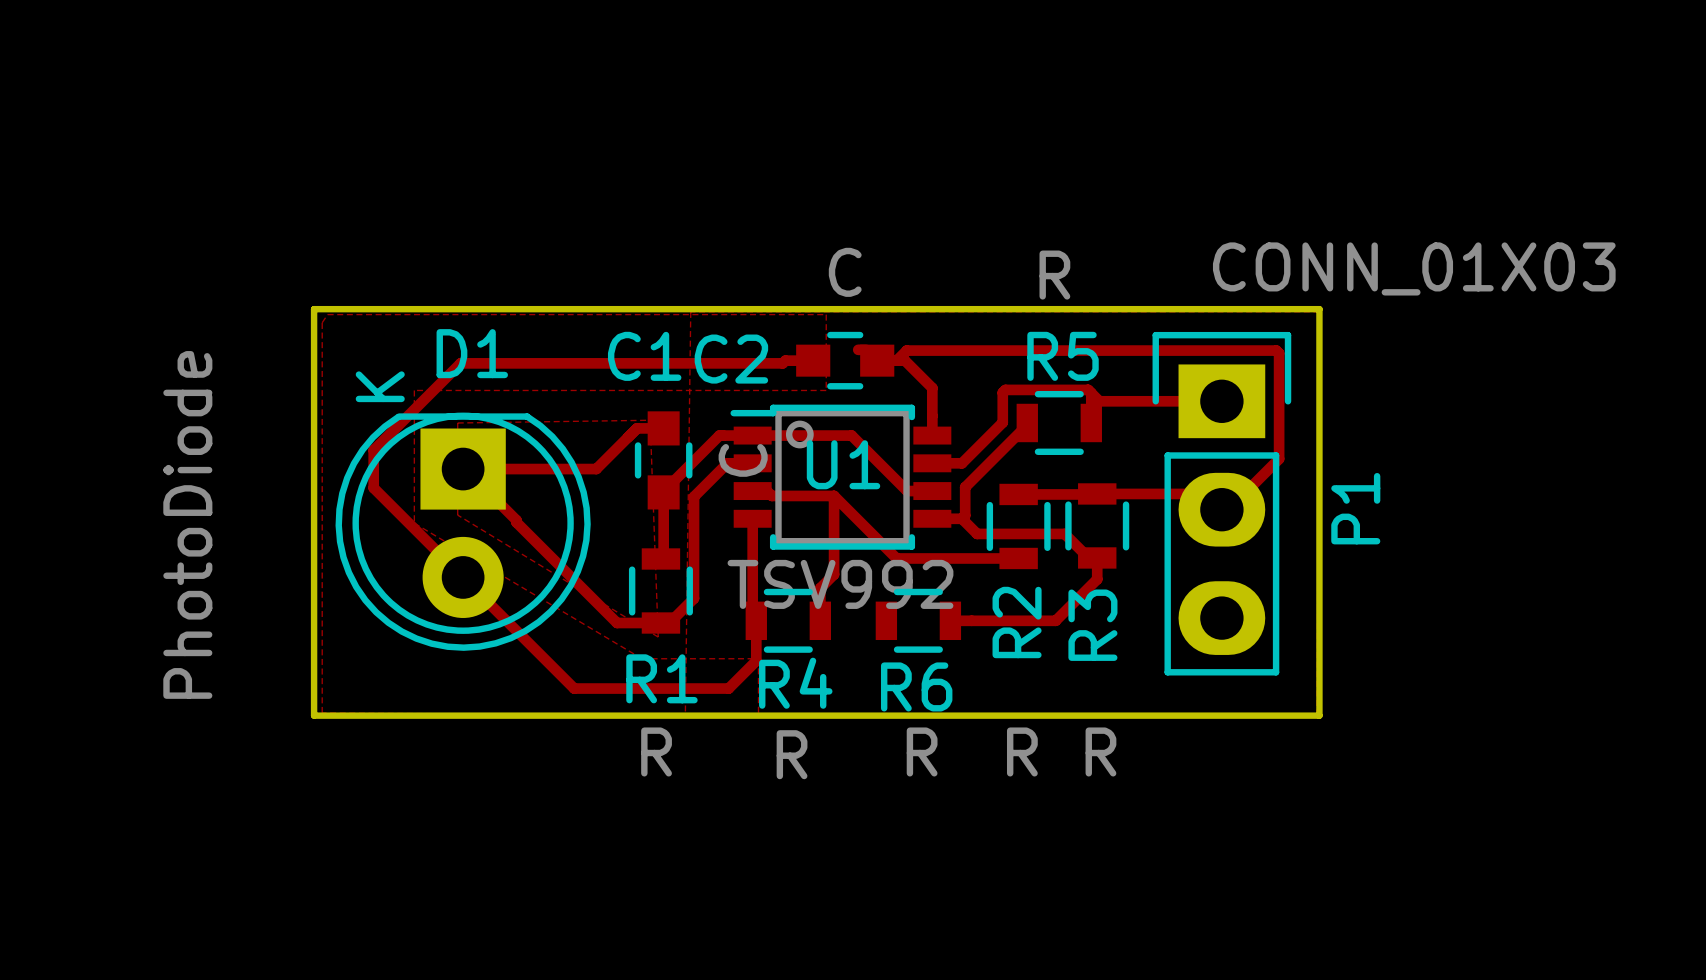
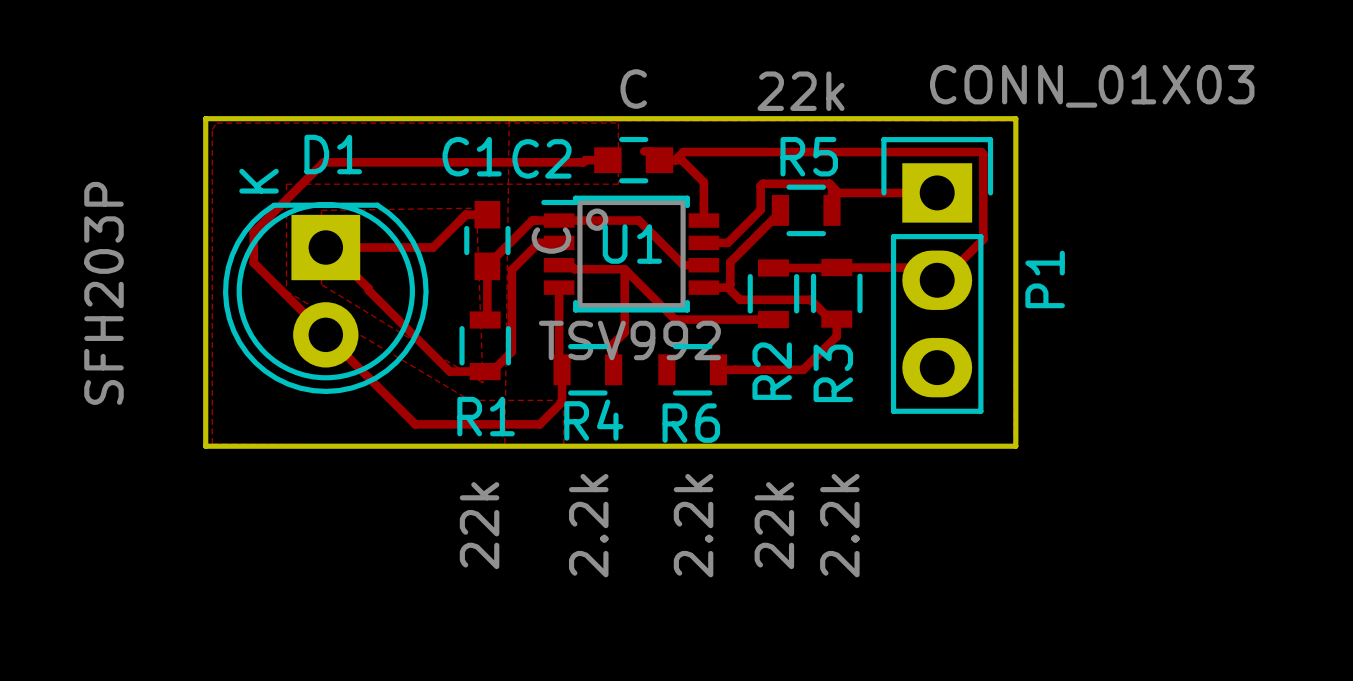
R5 value: R (1054, 275) -> 22k (801, 91)
D1 value: PhotoDiode (187, 524) -> SFH203P (103, 293)
R1 value: R (656, 751) -> 22k (479, 525)
R6 value: R (922, 751) -> 2.2k (693, 525)
R2 value: R (1022, 751) -> 22k (774, 525)
R3 value: R (1100, 751) -> 2.2k (839, 525)
R4 value: R (792, 754) -> 2.2k (588, 525)

